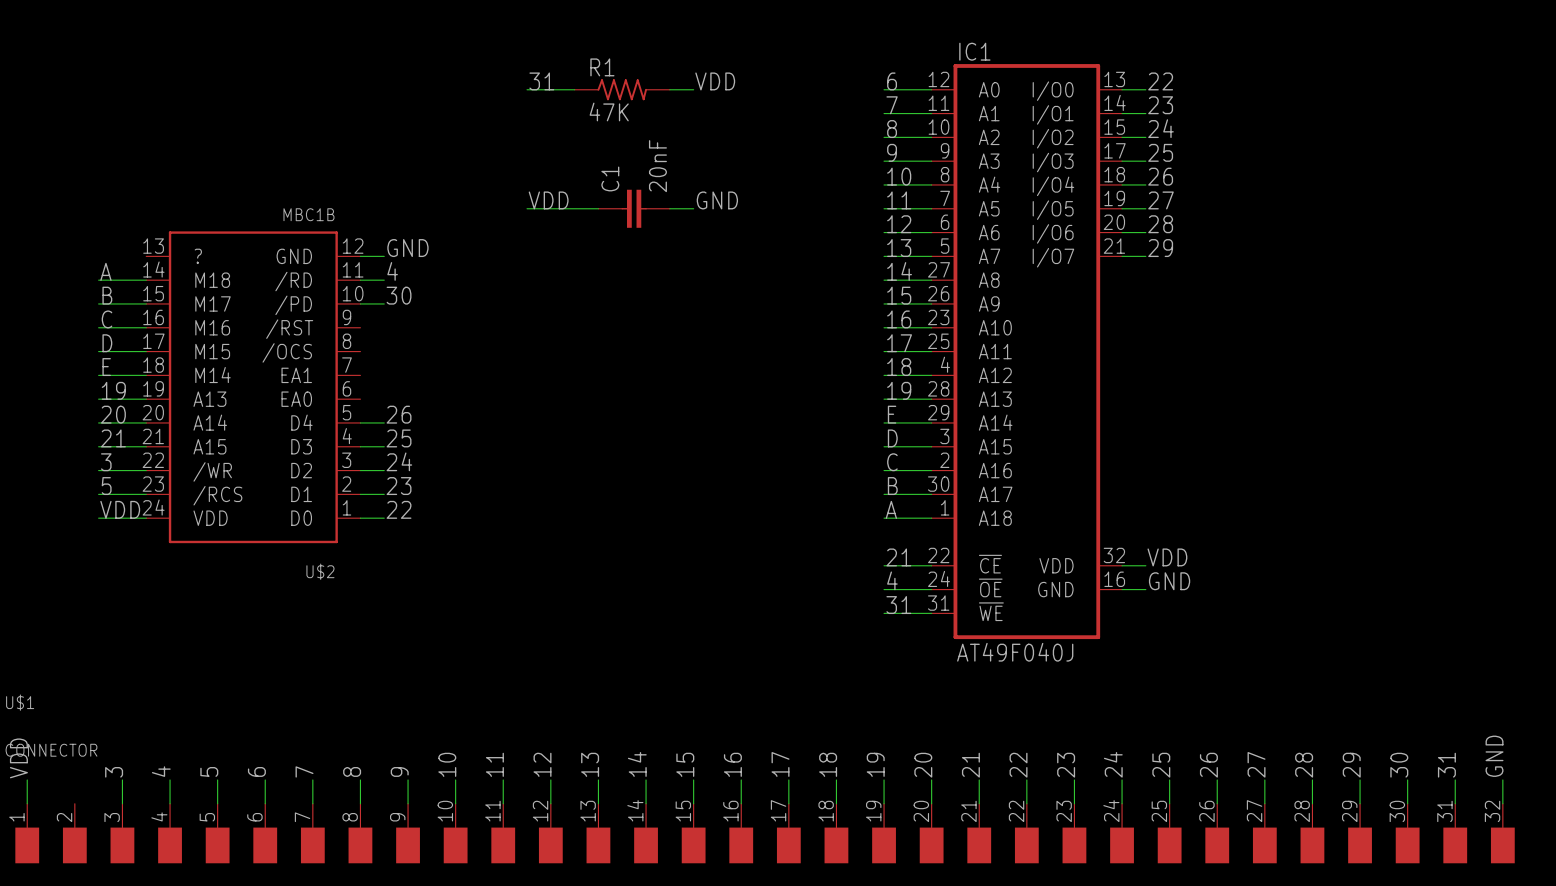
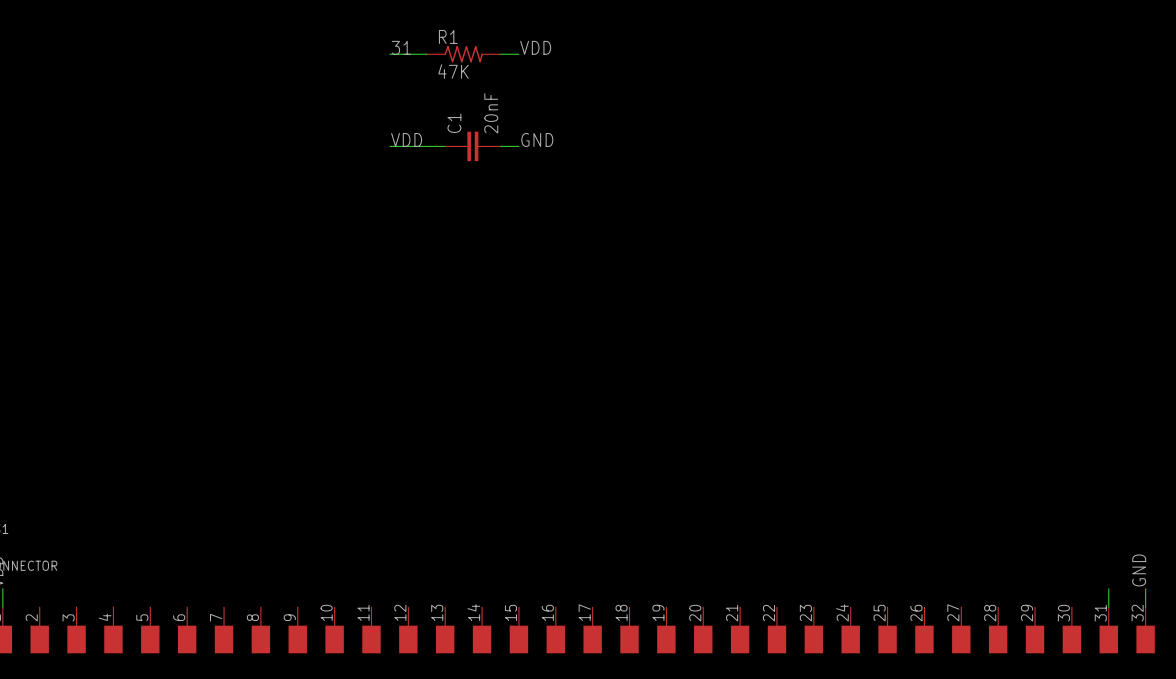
label: 6 (892, 81) -> none
label: 22 (1160, 81) -> none
wire: (884, 89) (931, 89) -> none
wire: (1122, 89) (1145, 89) -> none
label: 7 (892, 105) -> none
label: 23 (1160, 105) -> none
wire: (884, 113) (931, 113) -> none
wire: (1122, 113) (1145, 113) -> none
label: 24 (1161, 128) -> none
label: 8 (892, 129) -> none
wire: (884, 137) (931, 137) -> none
wire: (1122, 137) (1145, 137) -> none
label: 9 (892, 152) -> none
label: 25 (1160, 152) -> none
wire: (884, 161) (931, 161) -> none
wire: (1122, 161) (1145, 161) -> none
label: 10 (899, 176) -> none
label: 26 (1160, 176) -> none
wire: (884, 184) (931, 184) -> none
wire: (1122, 184) (1145, 184) -> none
label: 11 (899, 200) -> none
label: 27 (1161, 200) -> none
wire: (884, 208) (931, 208) -> none
wire: (1122, 208) (1145, 208) -> none
label: 12 (899, 224) -> none
label: 28 (1160, 224) -> none
wire: (884, 232) (931, 232) -> none
wire: (1122, 232) (1145, 232) -> none
label: GND (407, 248) -> none
label: 13 (899, 248) -> none
label: 29 (1160, 248) -> none
wire: (360, 256) (384, 256) -> none
wire: (884, 256) (931, 256) -> none
wire: (1122, 256) (1145, 256) -> none
label: A (105, 271) -> none
label: 4 (392, 271) -> none
label: 14 (899, 271) -> none
wire: (98, 280) (146, 280) -> none
wire: (360, 280) (384, 280) -> none
wire: (884, 280) (931, 280) -> none
label: B (107, 295) -> none
label: 30 (399, 295) -> none
label: 15 (899, 295) -> none
wire: (98, 303) (146, 303) -> none
wire: (360, 303) (384, 303) -> none
wire: (884, 303) (931, 303) -> none
label: C (107, 319) -> none
label: 16 (899, 319) -> none
wire: (98, 327) (146, 327) -> none
wire: (884, 327) (931, 327) -> none
label: D (107, 343) -> none
label: 17 (899, 343) -> none
wire: (98, 351) (146, 351) -> none
wire: (884, 351) (931, 351) -> none
IC1: AT49F040J (1026, 351) -> none
label: E (106, 367) -> none
label: 18 (899, 367) -> none
wire: (98, 375) (146, 375) -> none
wire: (884, 375) (931, 375) -> none
U$2: MBC1B (253, 387) -> none
label: 19 (113, 390) -> none
label: 19 (899, 390) -> none
wire: (98, 399) (146, 399) -> none
wire: (884, 399) (931, 399) -> none
label: 20 (113, 414) -> none
label: 26 (399, 414) -> none
label: E (892, 414) -> none
wire: (98, 422) (146, 422) -> none
wire: (360, 422) (384, 422) -> none
wire: (884, 422) (931, 422) -> none
label: 21 (113, 438) -> none
label: 25 (399, 438) -> none
label: D (892, 438) -> none
wire: (98, 446) (146, 446) -> none
wire: (360, 446) (384, 446) -> none
wire: (884, 446) (931, 446) -> none
label: 24 (399, 461) -> none
label: 3 (106, 462) -> none
label: C (892, 462) -> none
wire: (98, 470) (146, 470) -> none
wire: (360, 470) (384, 470) -> none
wire: (884, 470) (931, 470) -> none
label: 5 (106, 486) -> none
label: 23 (399, 486) -> none
label: B (892, 486) -> none
wire: (98, 494) (146, 494) -> none
wire: (360, 494) (384, 494) -> none
wire: (884, 494) (931, 494) -> none
label: VDD (120, 509) -> none
label: 22 (399, 509) -> none
label: A (891, 509) -> none
wire: (98, 518) (146, 518) -> none
wire: (360, 518) (384, 518) -> none
wire: (884, 518) (931, 518) -> none
label: 21 (898, 557) -> none
label: VDD (1167, 557) -> none
wire: (884, 565) (931, 565) -> none
wire: (1122, 565) (1145, 565) -> none
label: 4 (892, 580) -> none
label: GND (1169, 581) -> none
wire: (884, 589) (931, 589) -> none
wire: (1122, 589) (1145, 589) -> none
label: 31 (898, 605) -> none
wire: (884, 613) (931, 613) -> none
label: 10 (447, 764) -> none
label: 11 (494, 764) -> none
label: 12 (542, 764) -> none
label: 13 (590, 764) -> none
label: 14 (637, 764) -> none
label: 15 (685, 764) -> none
label: 16 (732, 764) -> none
label: 17 (780, 764) -> none
label: 18 (828, 764) -> none
label: 19 (875, 764) -> none
label: 24 (1113, 764) -> none
label: 27 (1256, 764) -> none
label: 20 (923, 765) -> none
label: 21 (970, 765) -> none
label: 22 (1018, 765) -> none
label: 23 (1066, 765) -> none
label: 25 (1161, 765) -> none
label: 26 (1208, 765) -> none
label: 28 (1304, 765) -> none
label: 29 (1351, 765) -> none
label: 30 (1399, 765) -> none
label: 31 (1446, 765) -> none
label: 4 (161, 771) -> none
label: 5 (209, 771) -> none
label: 6 (256, 771) -> none
label: 7 (304, 771) -> none
label: 8 (352, 771) -> none
label: 9 (399, 771) -> none
label: 3 (114, 772) -> none
wire: (122, 779) (122, 803) -> none
wire: (170, 779) (170, 803) -> none
wire: (217, 779) (217, 803) -> none
wire: (265, 779) (265, 803) -> none
wire: (312, 779) (312, 803) -> none
wire: (360, 779) (360, 803) -> none
wire: (408, 779) (408, 803) -> none
wire: (455, 779) (455, 803) -> none
wire: (503, 779) (503, 803) -> none
wire: (550, 779) (550, 803) -> none
wire: (598, 779) (598, 803) -> none
wire: (646, 779) (646, 803) -> none
wire: (693, 779) (693, 803) -> none
wire: (741, 779) (741, 803) -> none
wire: (788, 779) (788, 803) -> none
wire: (836, 779) (836, 803) -> none
wire: (884, 779) (884, 803) -> none
wire: (931, 779) (931, 803) -> none
wire: (979, 779) (979, 803) -> none
wire: (1026, 779) (1026, 803) -> none
wire: (1074, 779) (1074, 803) -> none
wire: (1122, 779) (1122, 803) -> none
wire: (1169, 779) (1169, 803) -> none
wire: (1217, 779) (1217, 803) -> none
wire: (1264, 779) (1264, 803) -> none
wire: (1312, 779) (1312, 803) -> none
wire: (1360, 779) (1360, 803) -> none
wire: (1407, 779) (1407, 803) -> none

